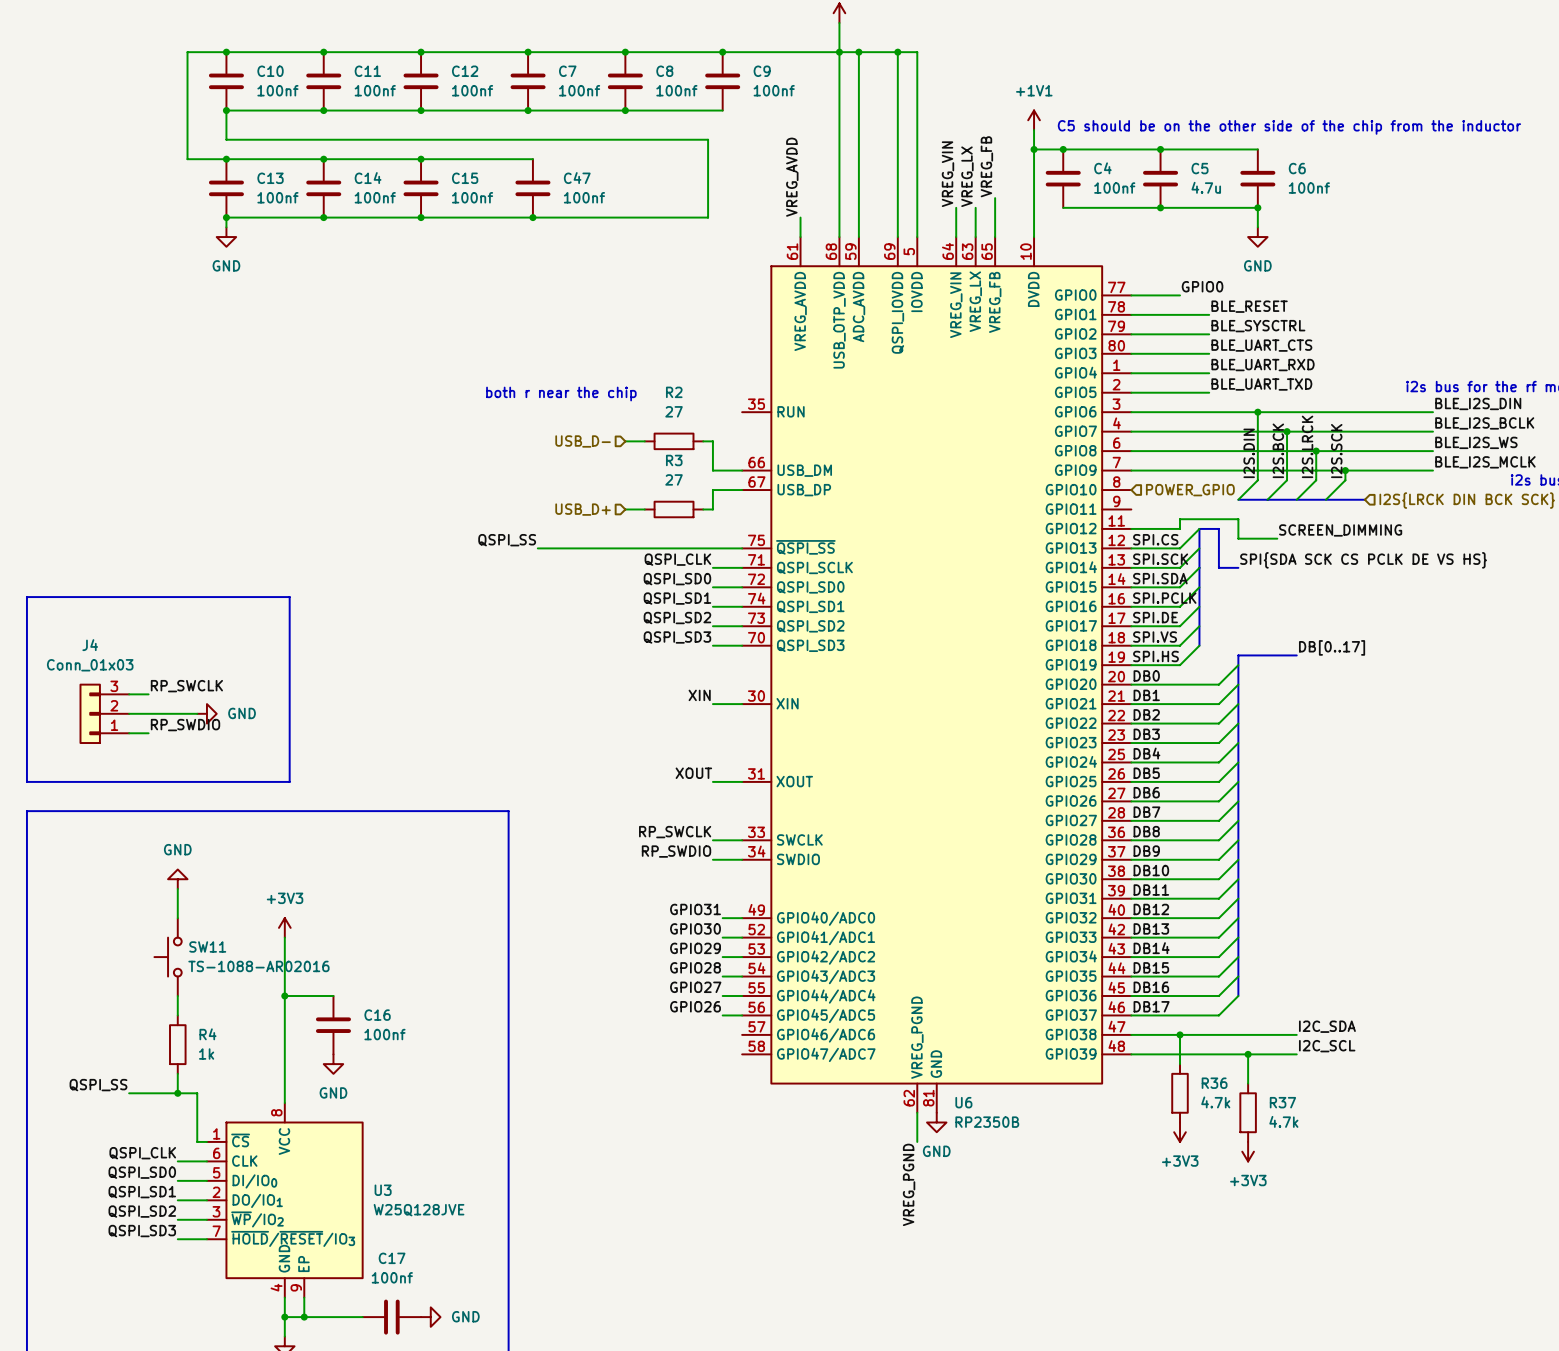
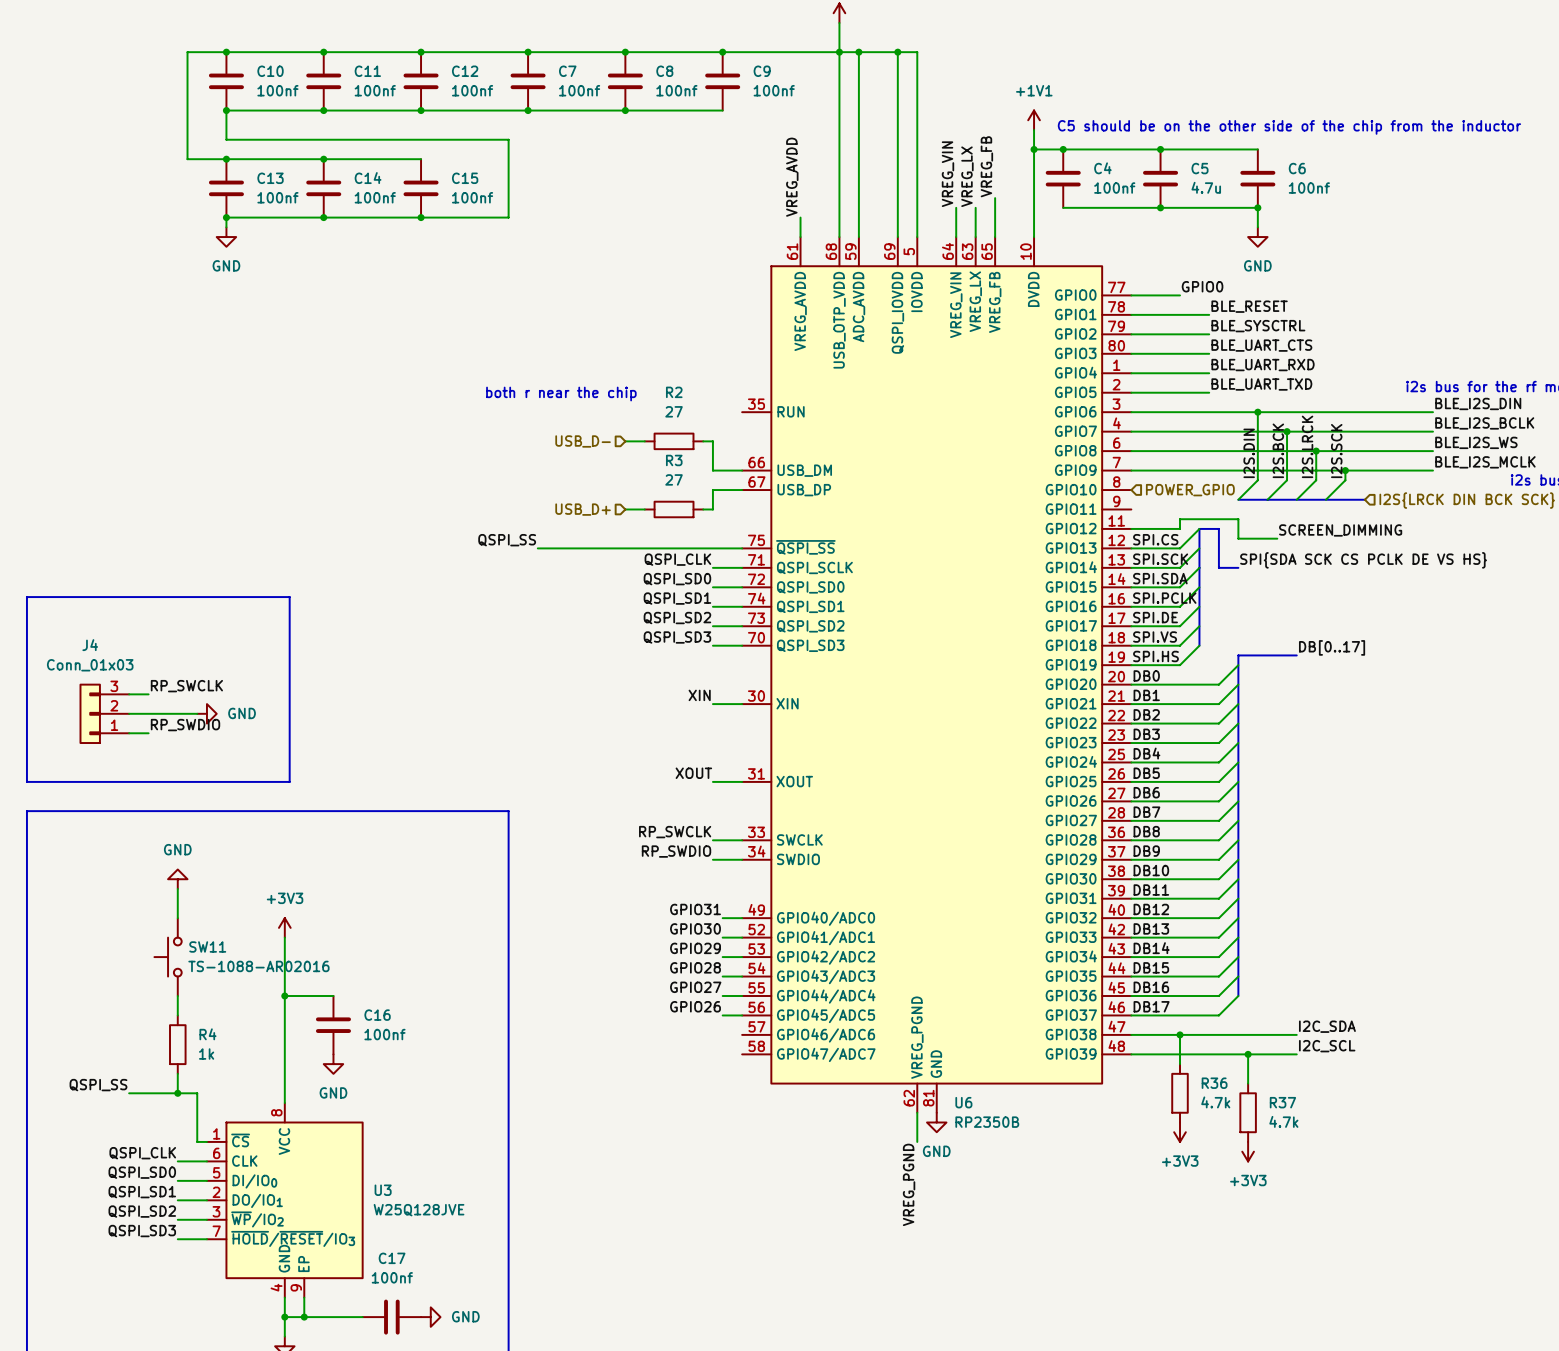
wire: (508, 139) (708, 139) (708, 217) (508, 217) -> (508, 139) (508, 217)
wire: (421, 159) (532, 159) -> none
junction: (421, 159) -> none
C47: 100nf (532, 188) -> none
junction: (532, 217) -> none

